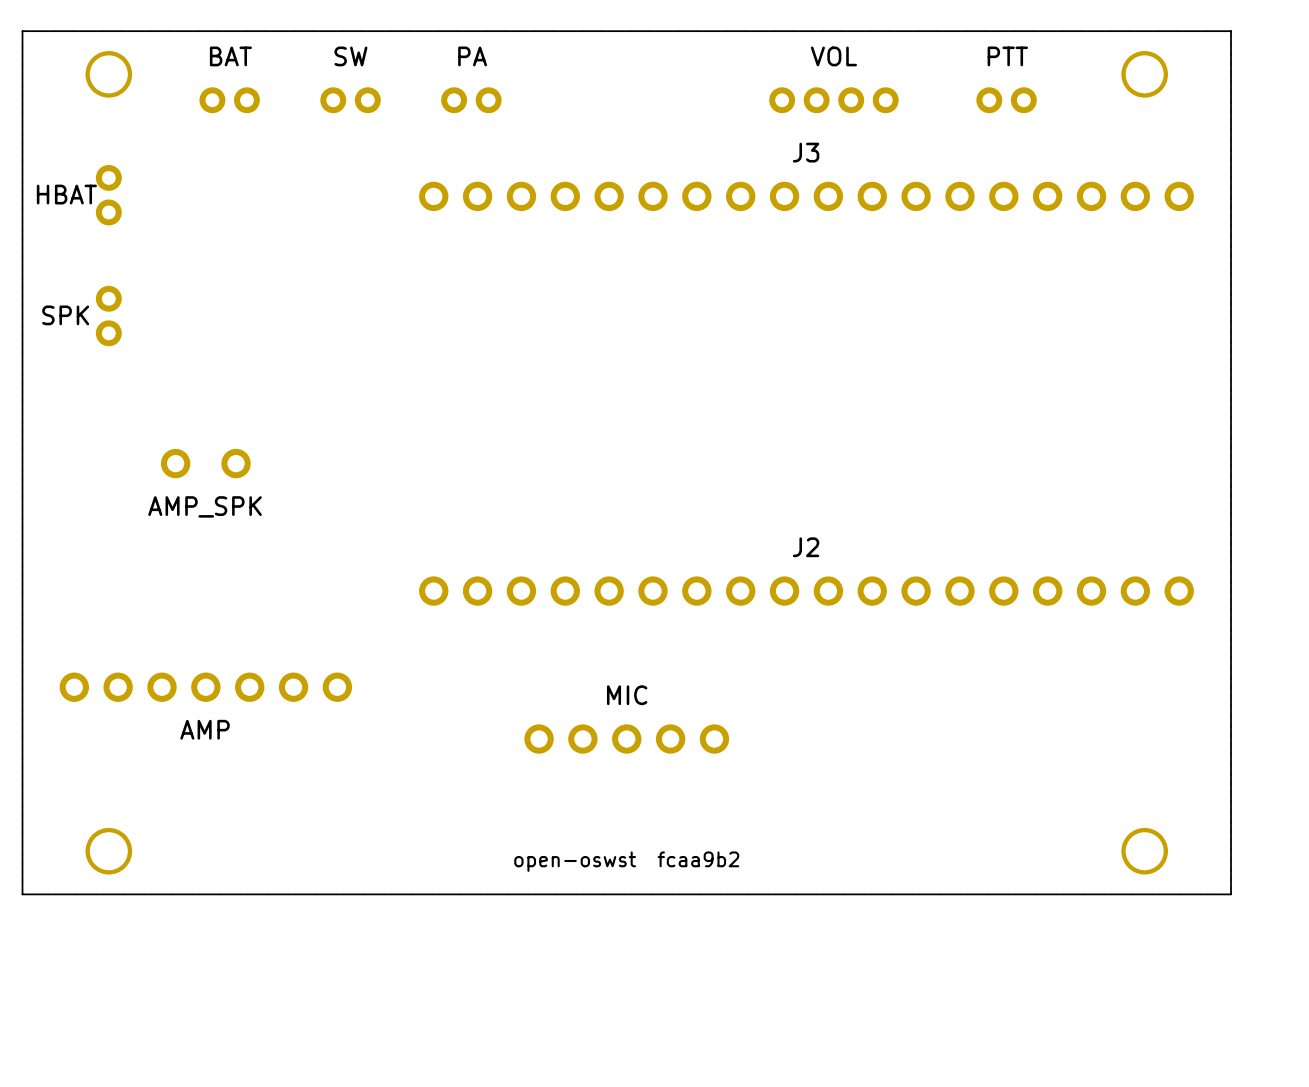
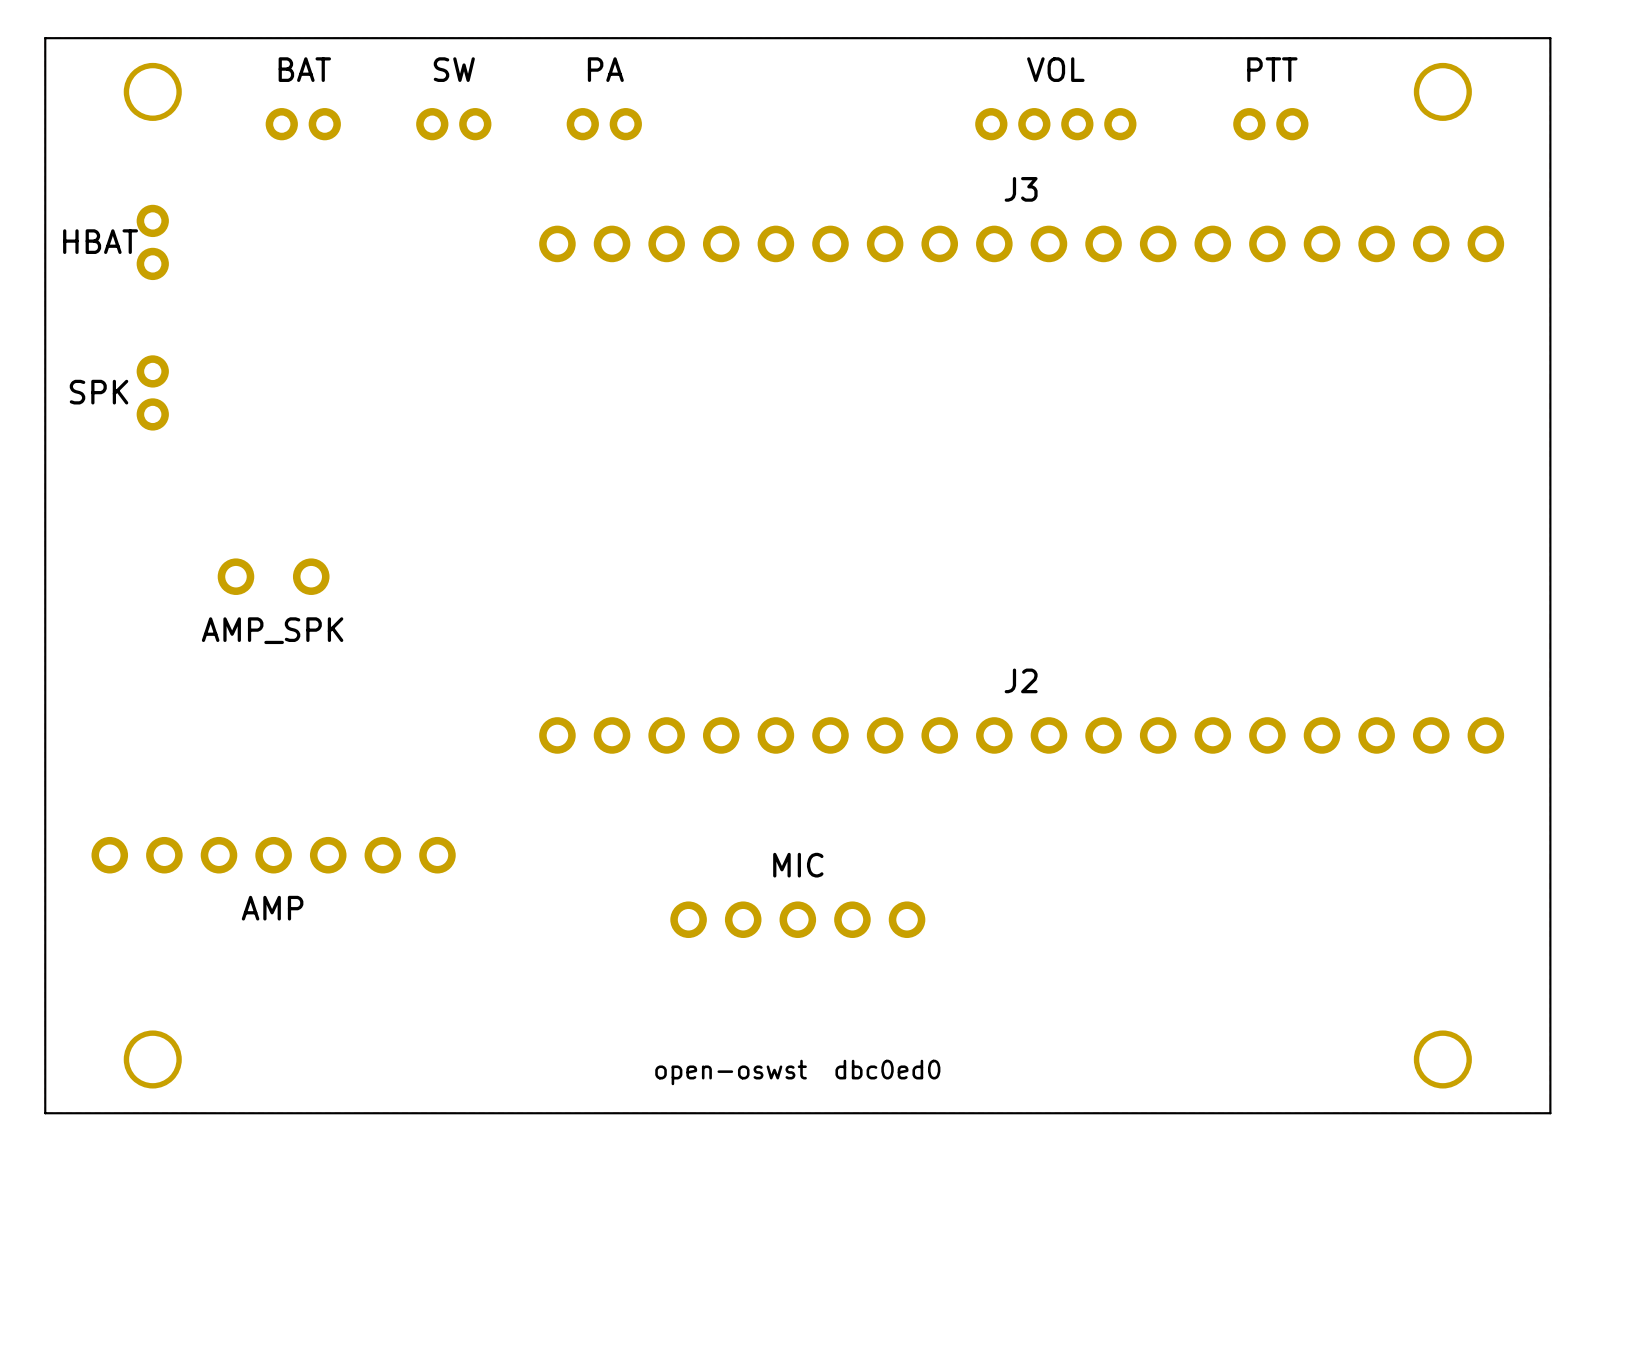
text: open-oswst fcaa9b2 (626, 861) -> open-oswst dbc0ed0 (797, 1072)

